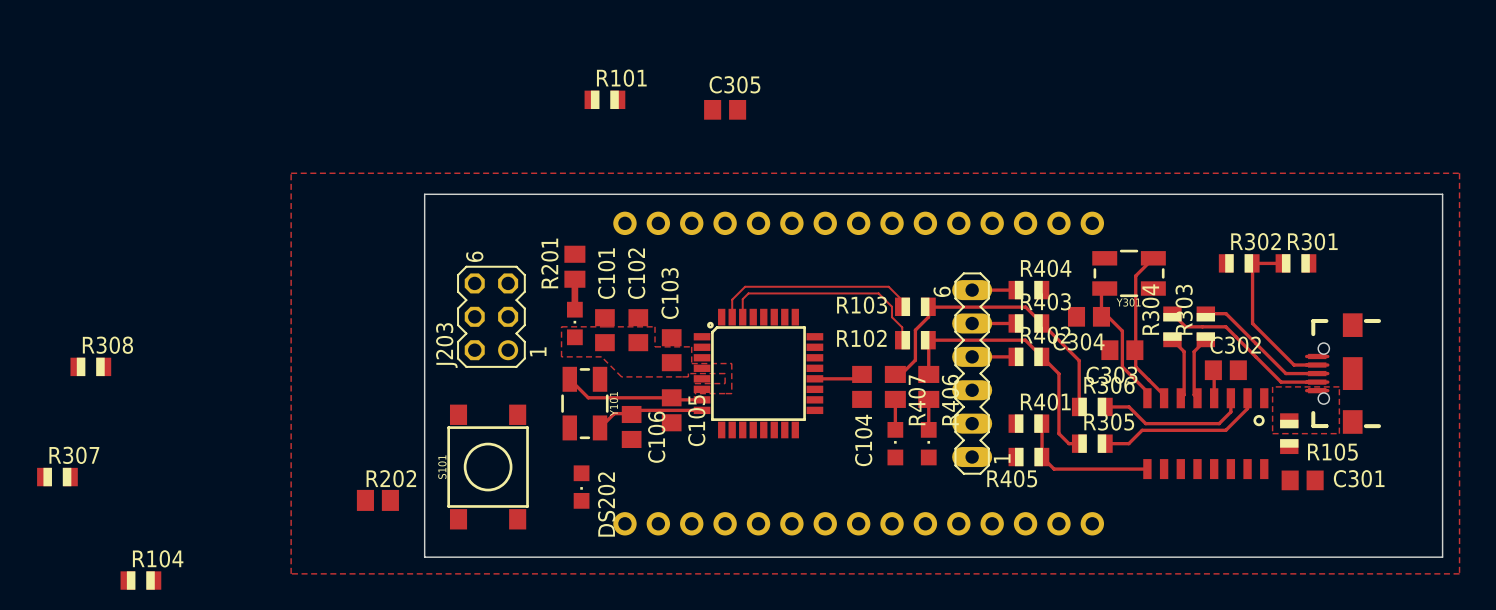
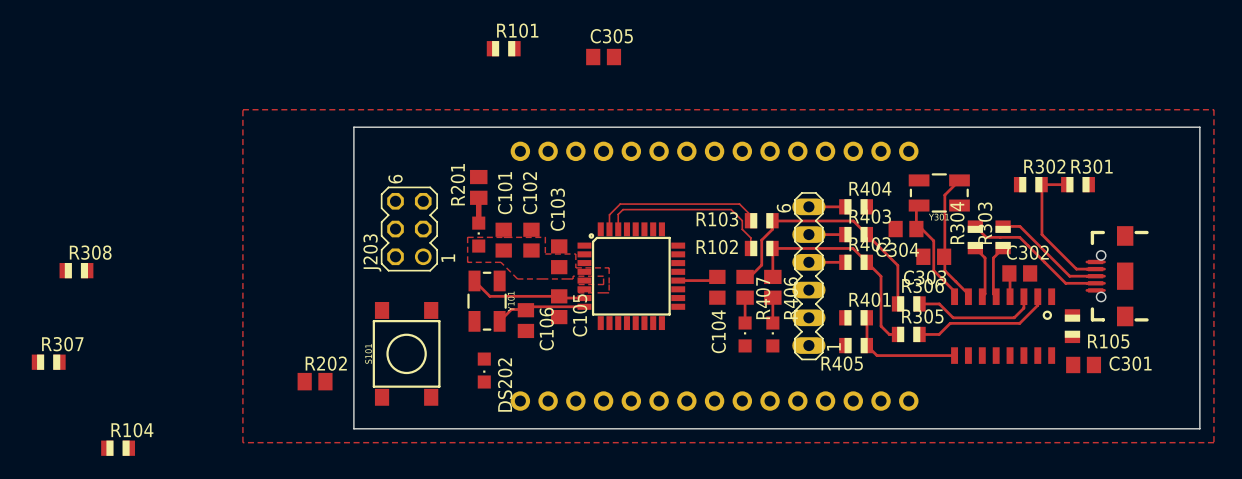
top zone outline: (1272, 386) (1339, 386) (1339, 433) (1272, 433) (1272, 386) -> none

